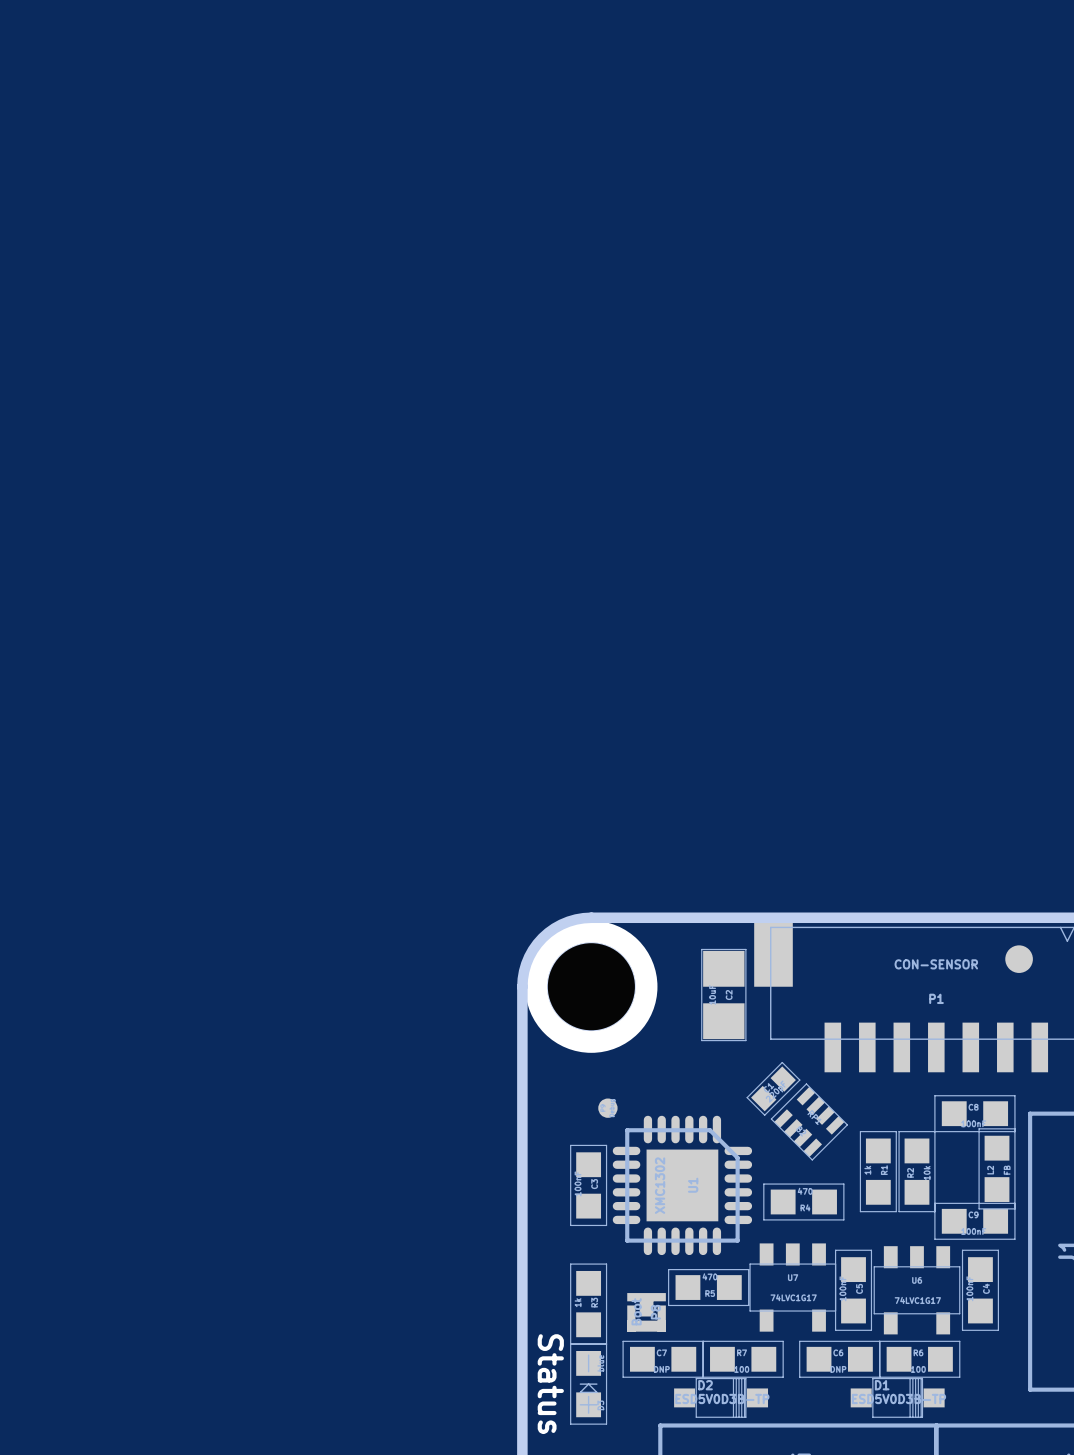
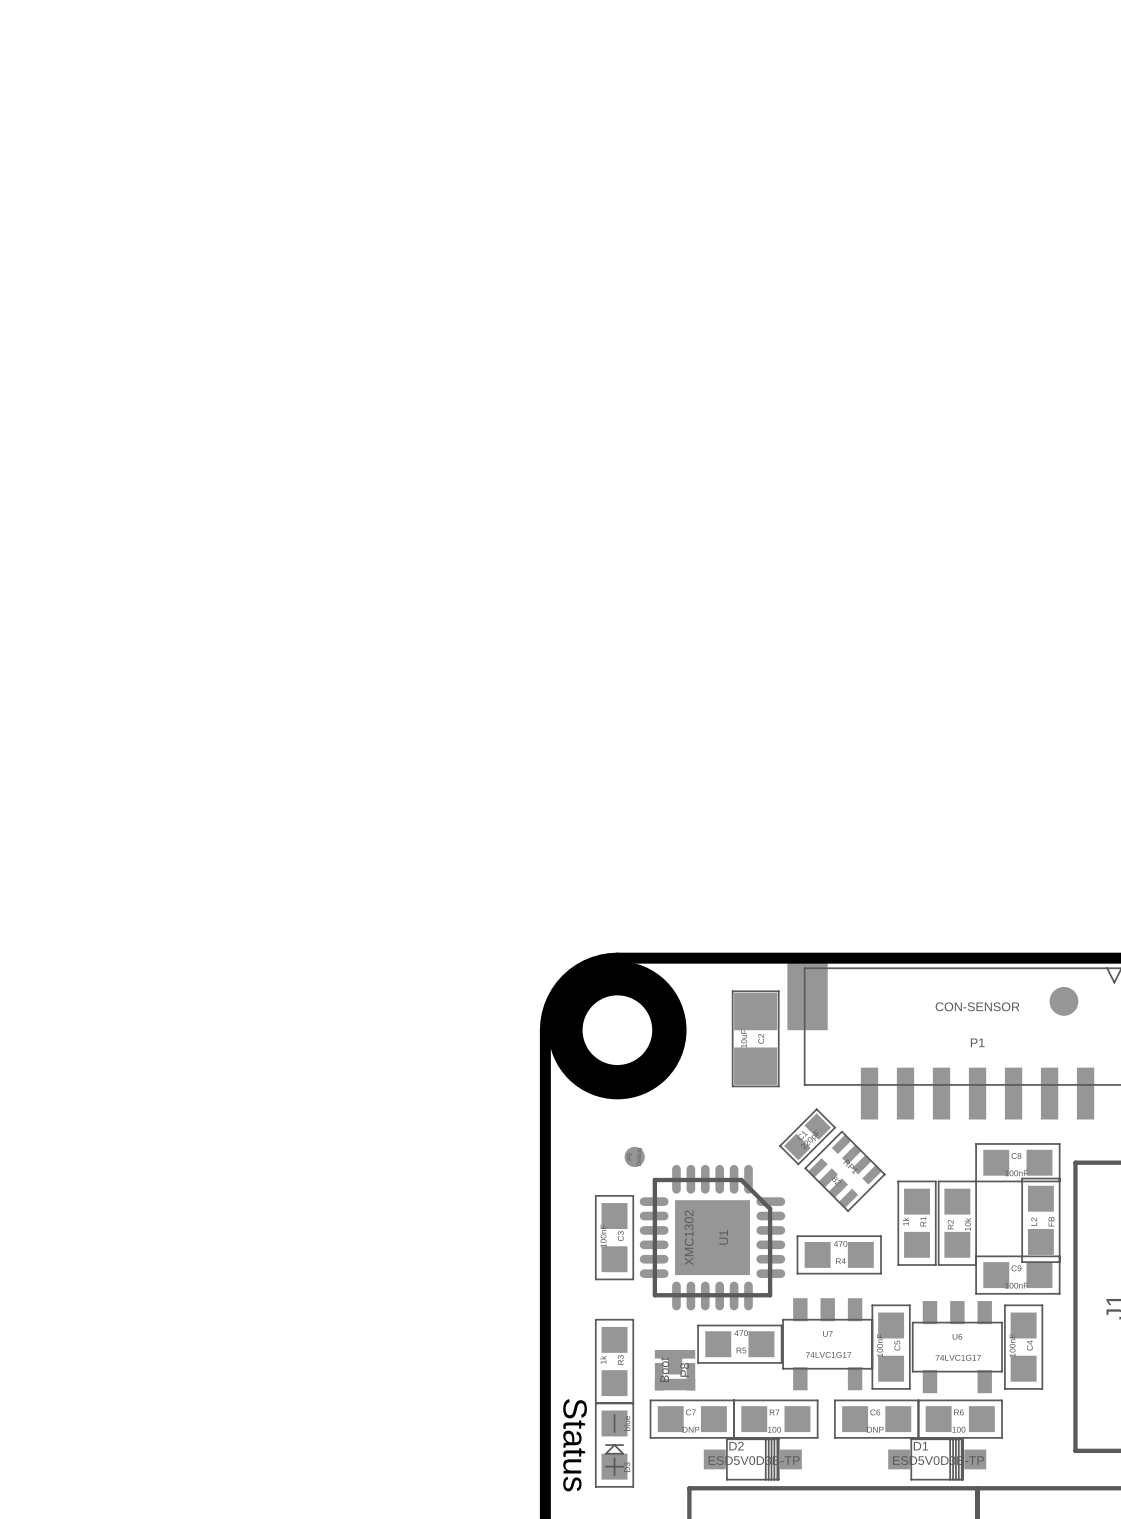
part footprint: [525, 920, 658, 1053] -> [548, 961, 687, 1100]

